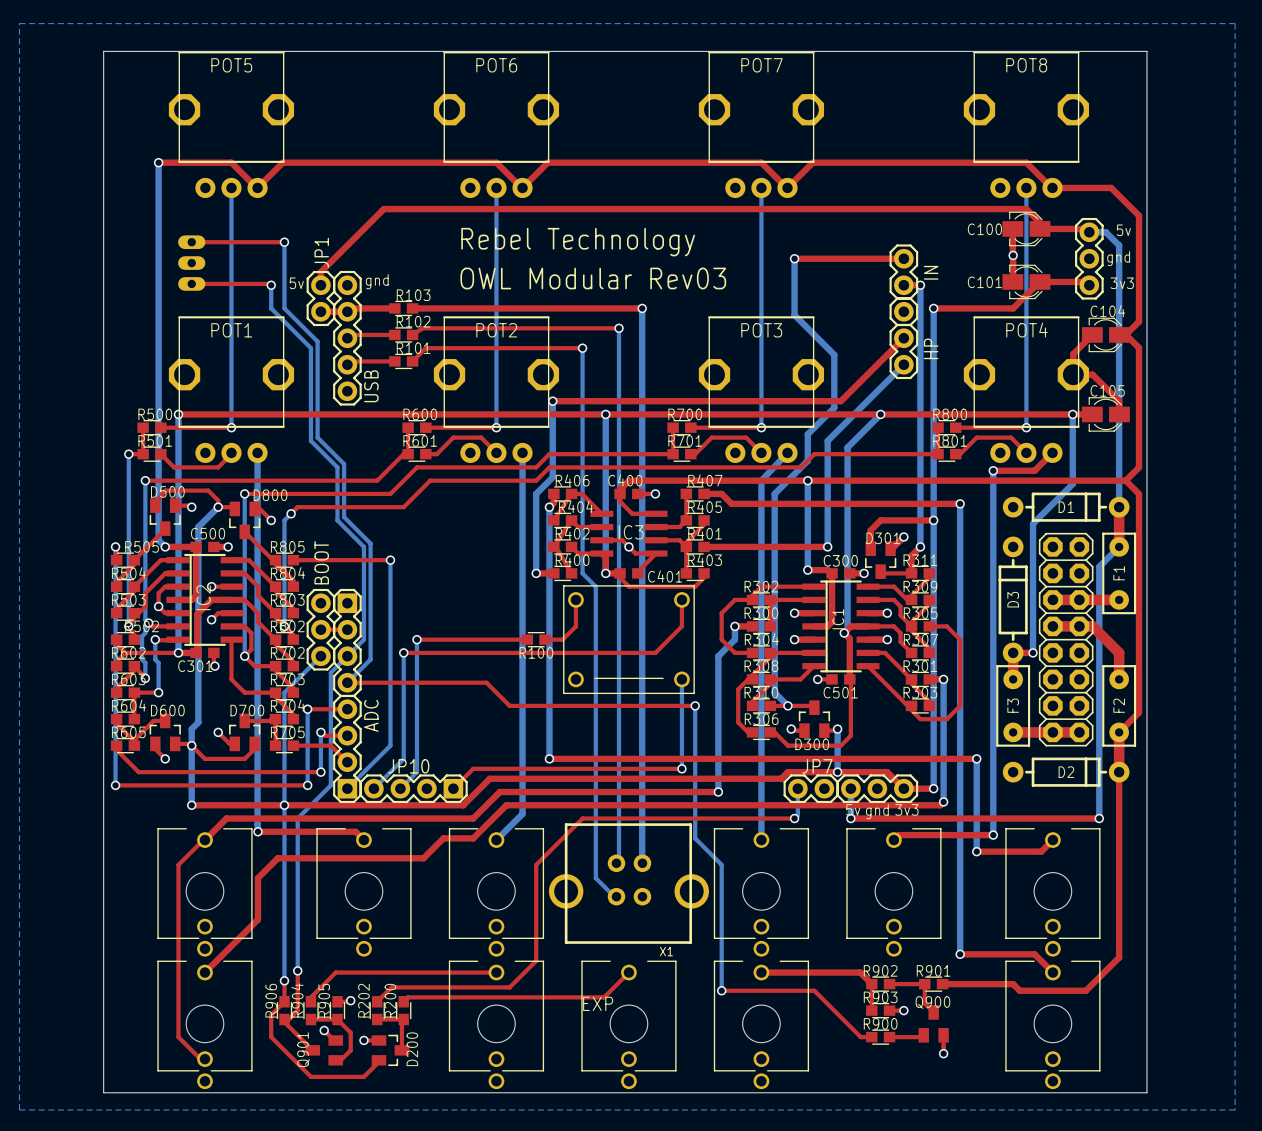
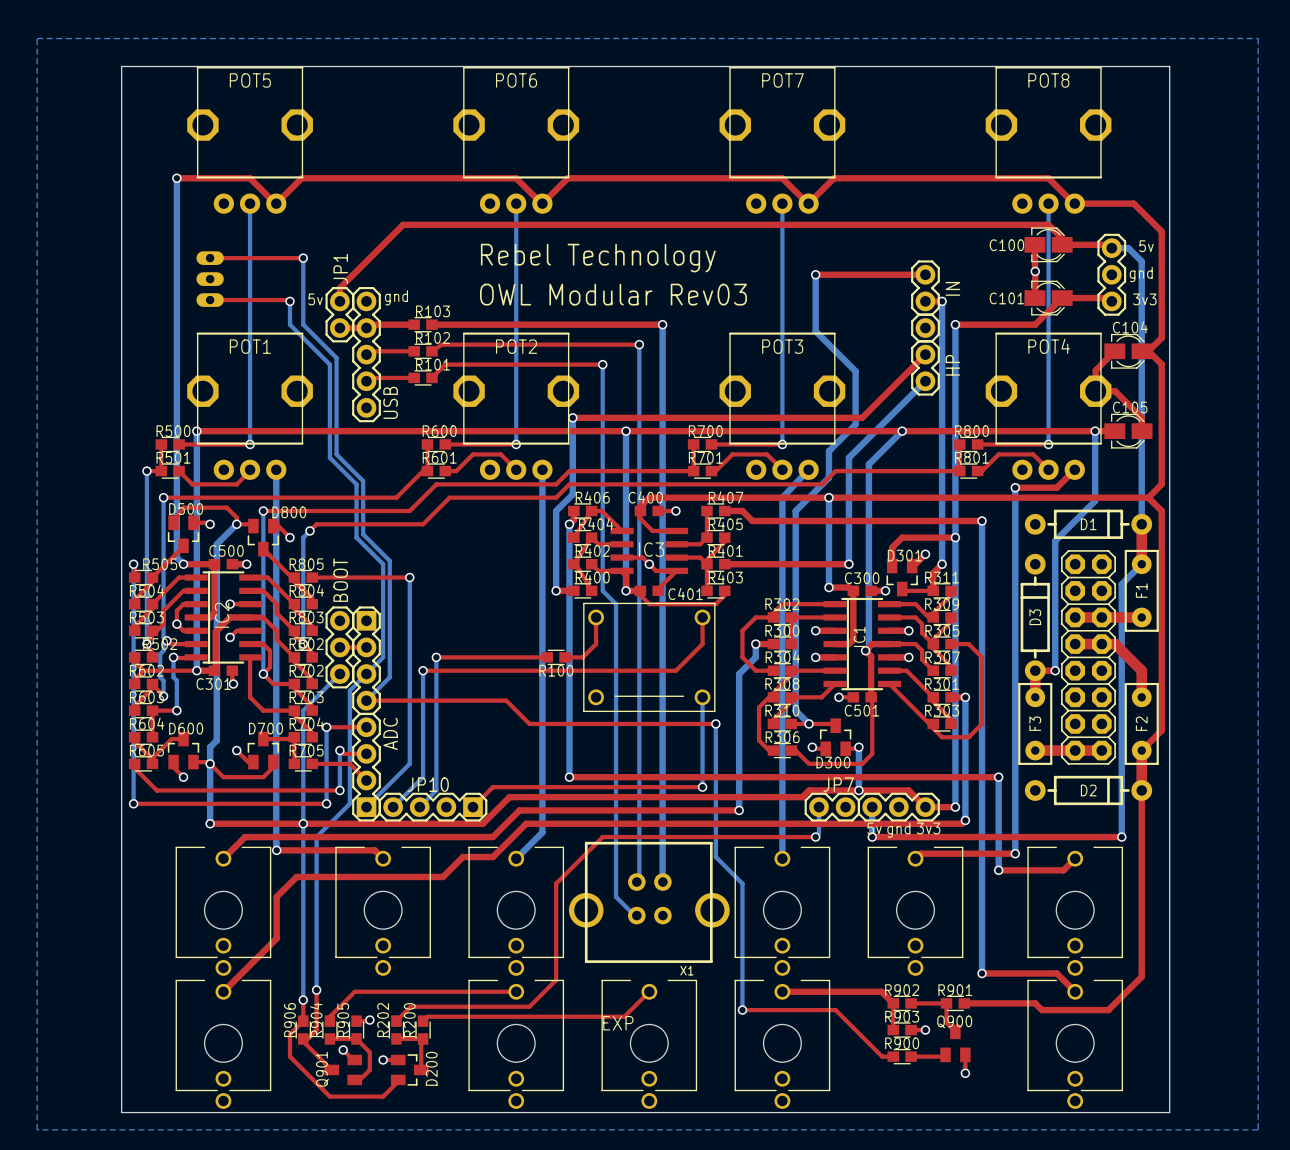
top track: (204, 840) (204, 838) (178, 864) (178, 1037) (200, 1059) (204, 1059) -> none

